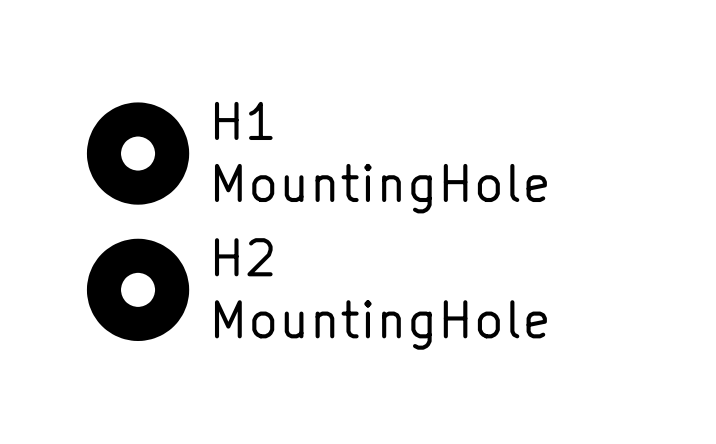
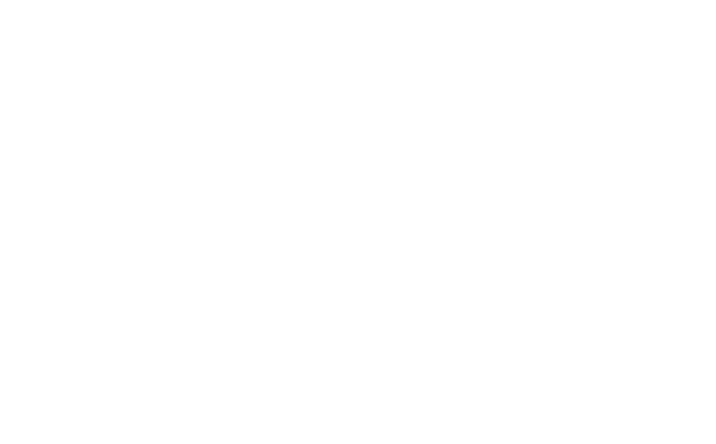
H1: MountingHole (138, 153) -> none
H2: MountingHole (138, 289) -> none

